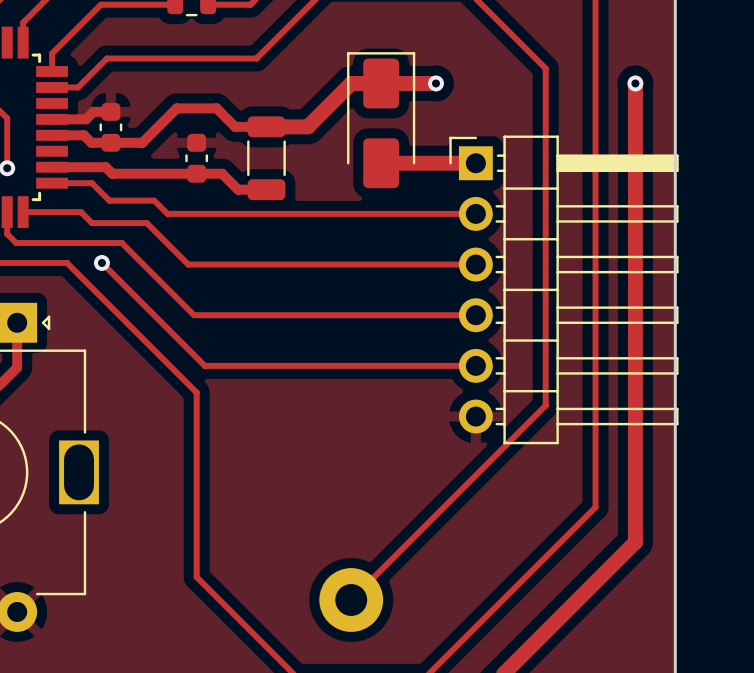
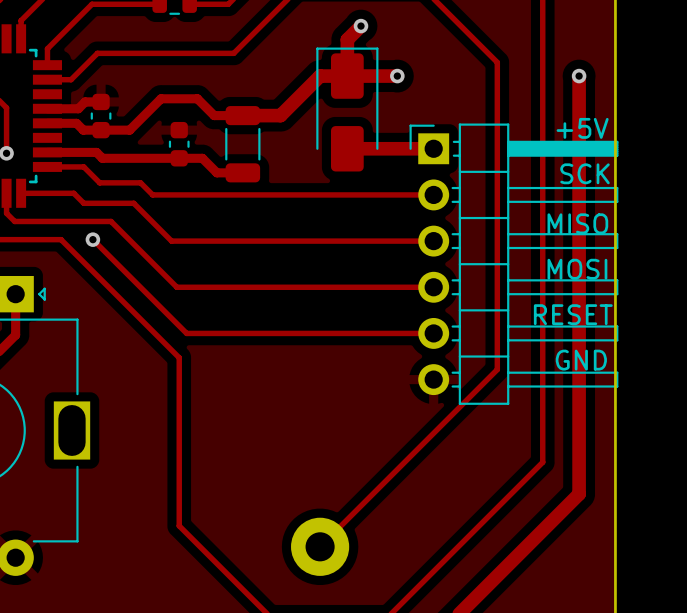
track: none -> (360, 26) (347, 39) (347, 76)
via: none -> (360, 26)
text: none -> +5V (582, 128)
text: none -> SCK (585, 173)
text: none -> MISO (577, 223)
text: none -> MOSI (577, 269)
text: none -> RESET (573, 314)
text: none -> GND (581, 360)

